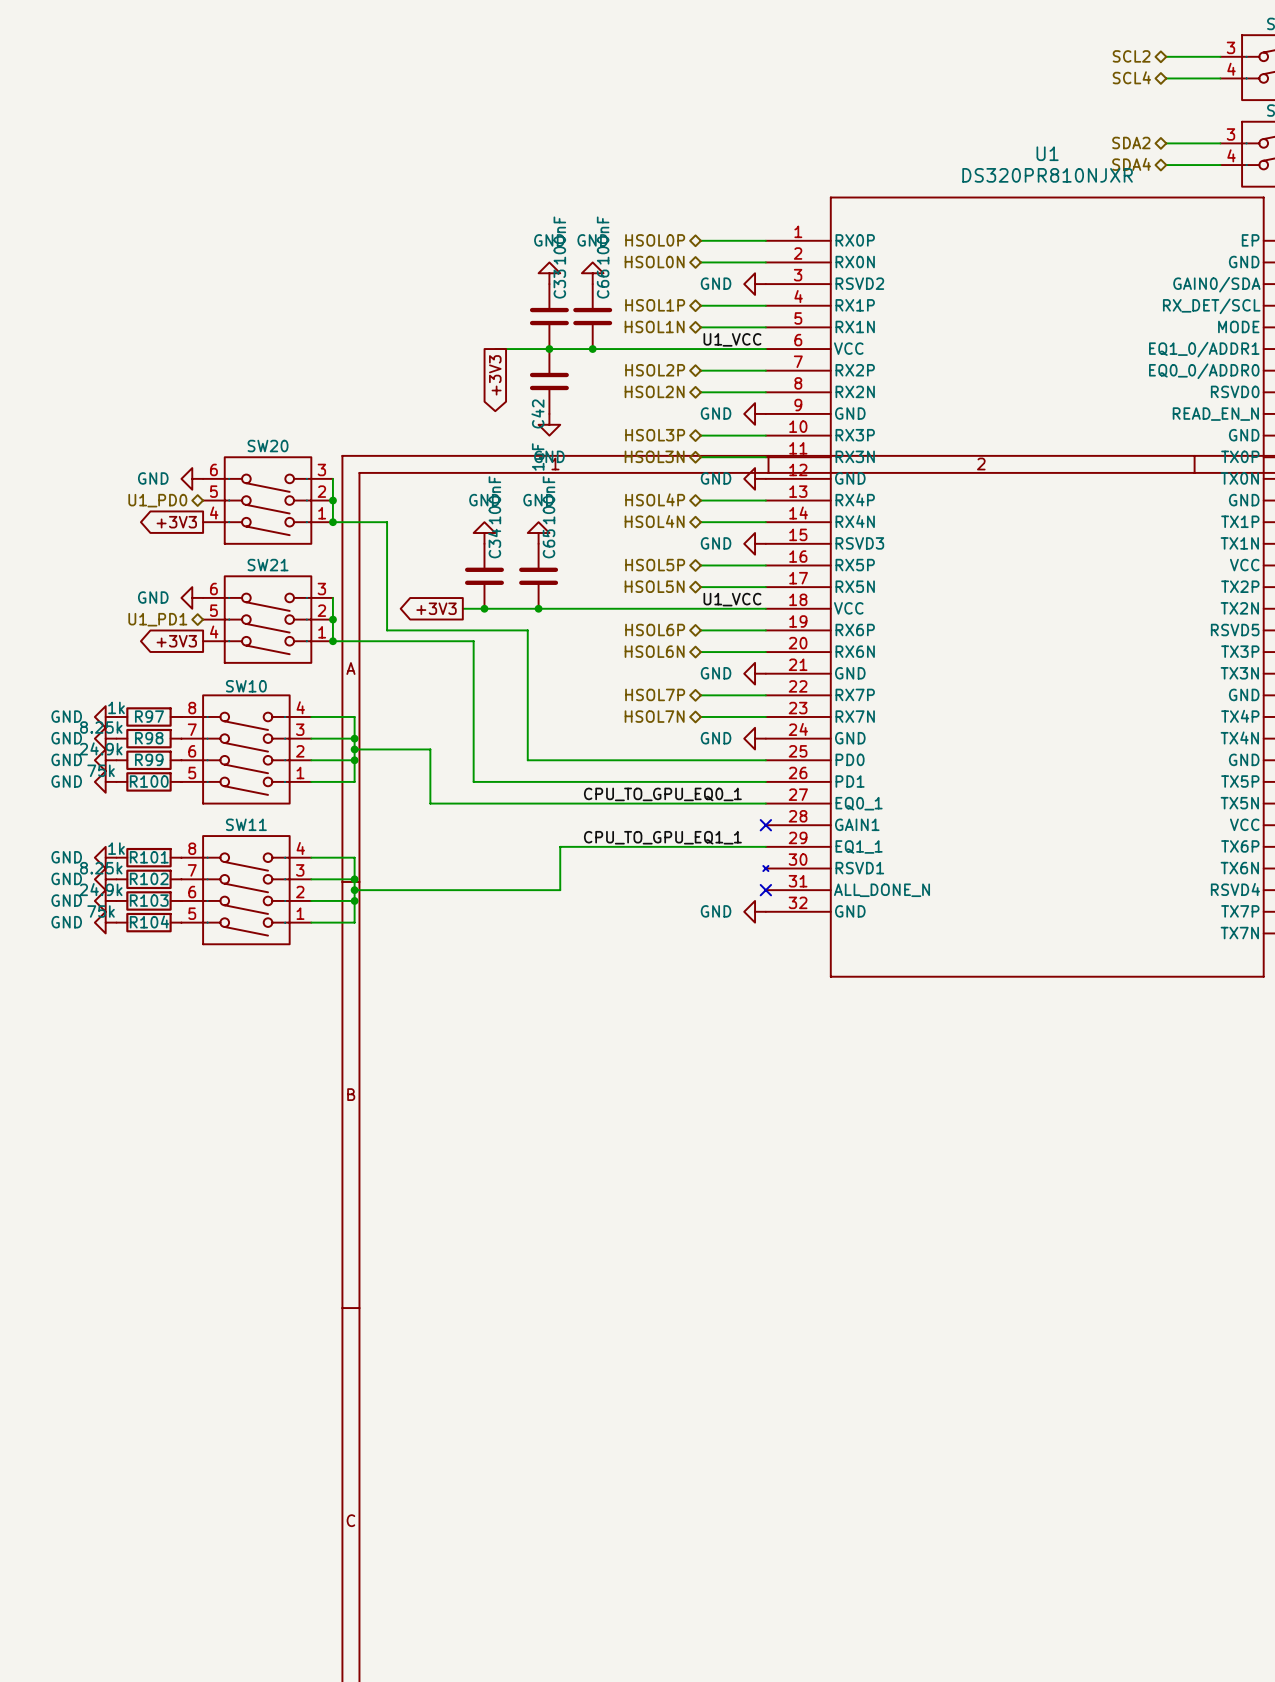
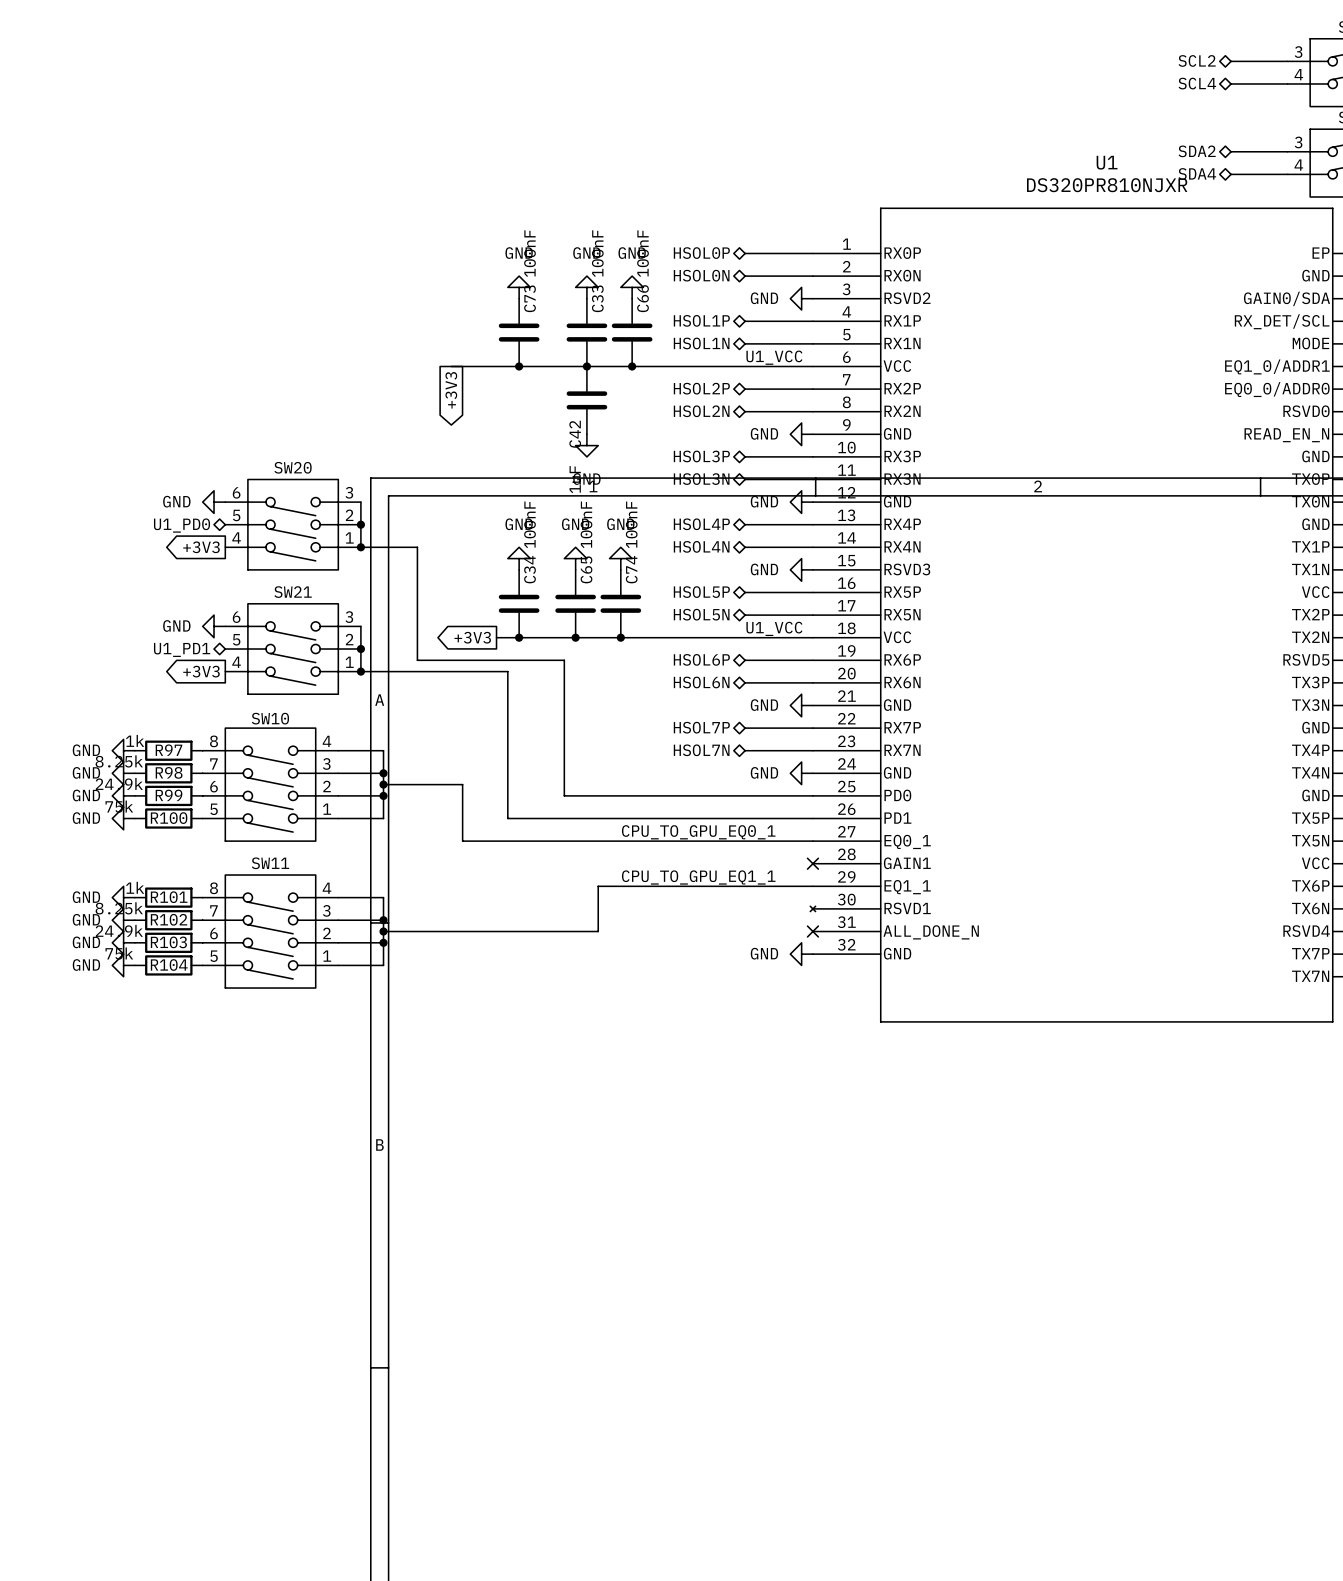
power symbol: none -> GND (519, 287)
C73: none -> 100nF (519, 332)
wire: none -> (451, 366) (530, 366)
junction: none -> (519, 366)
global label position: +3V3 (495, 375) -> +3V3 (451, 390)
power symbol: none -> GND (620, 558)
C74: none -> 100nF (620, 603)
junction: none -> (620, 637)

